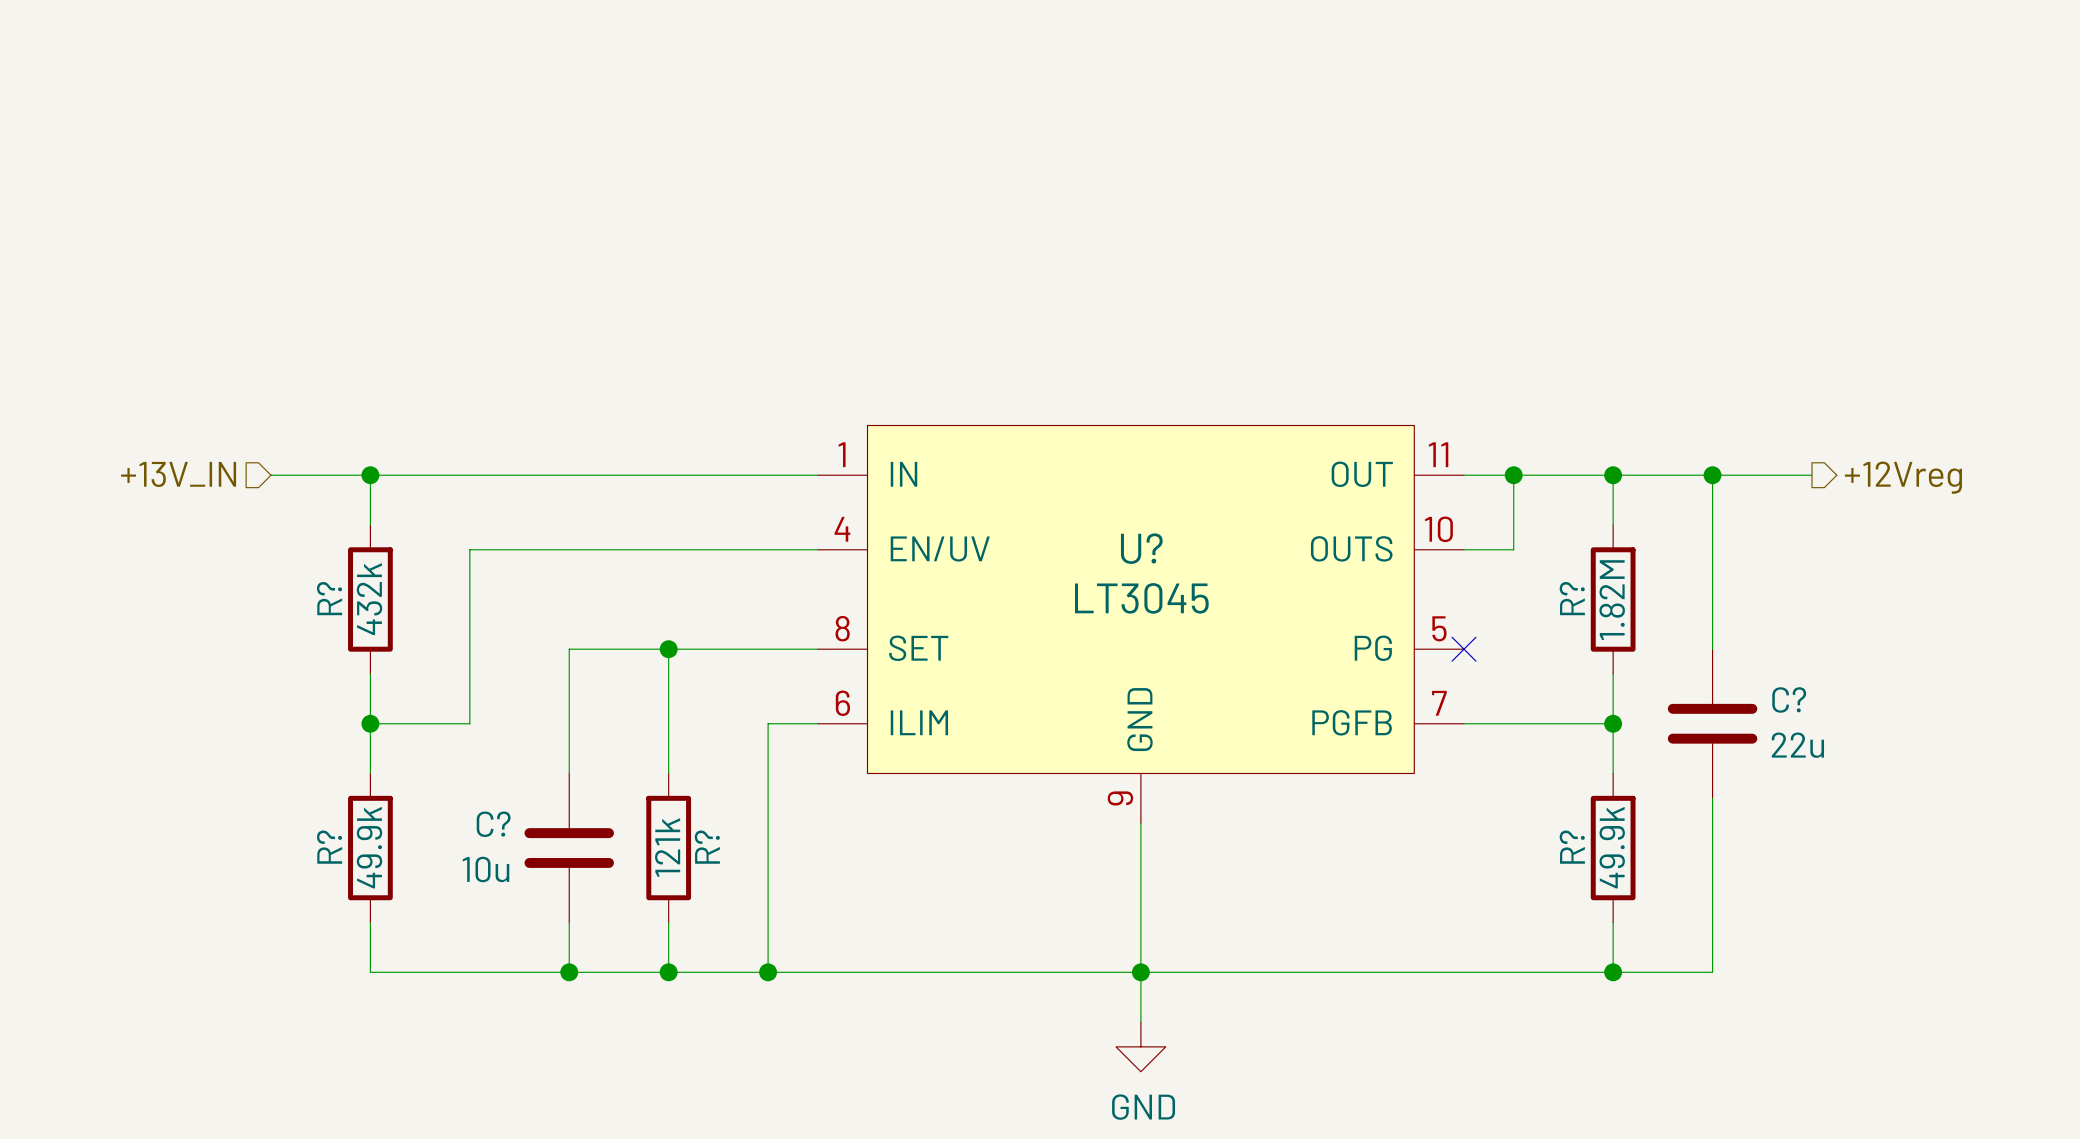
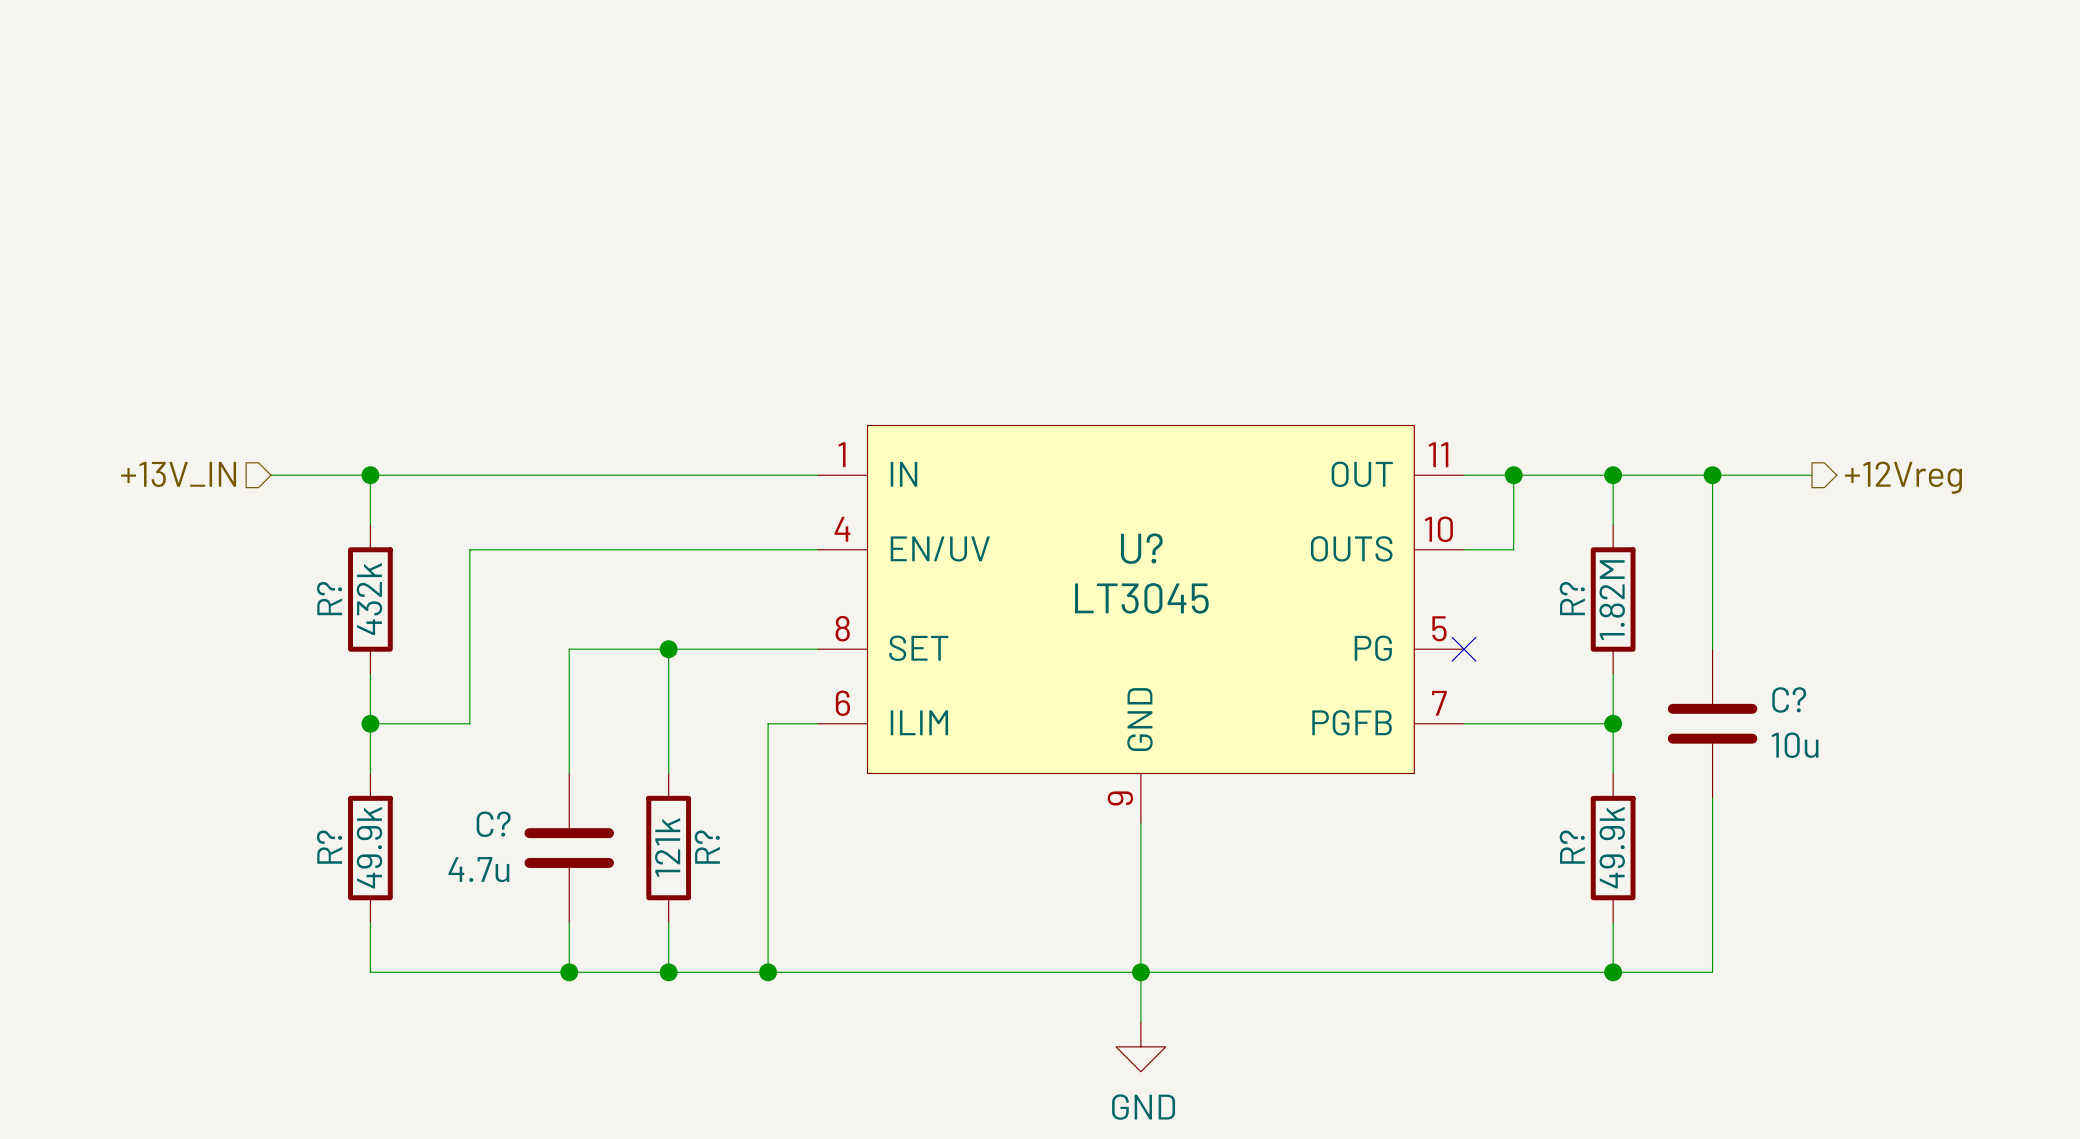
C? value: 22u (1797, 745) -> 10u (1795, 745)
C? value: 10u (485, 869) -> 4.7u (478, 869)

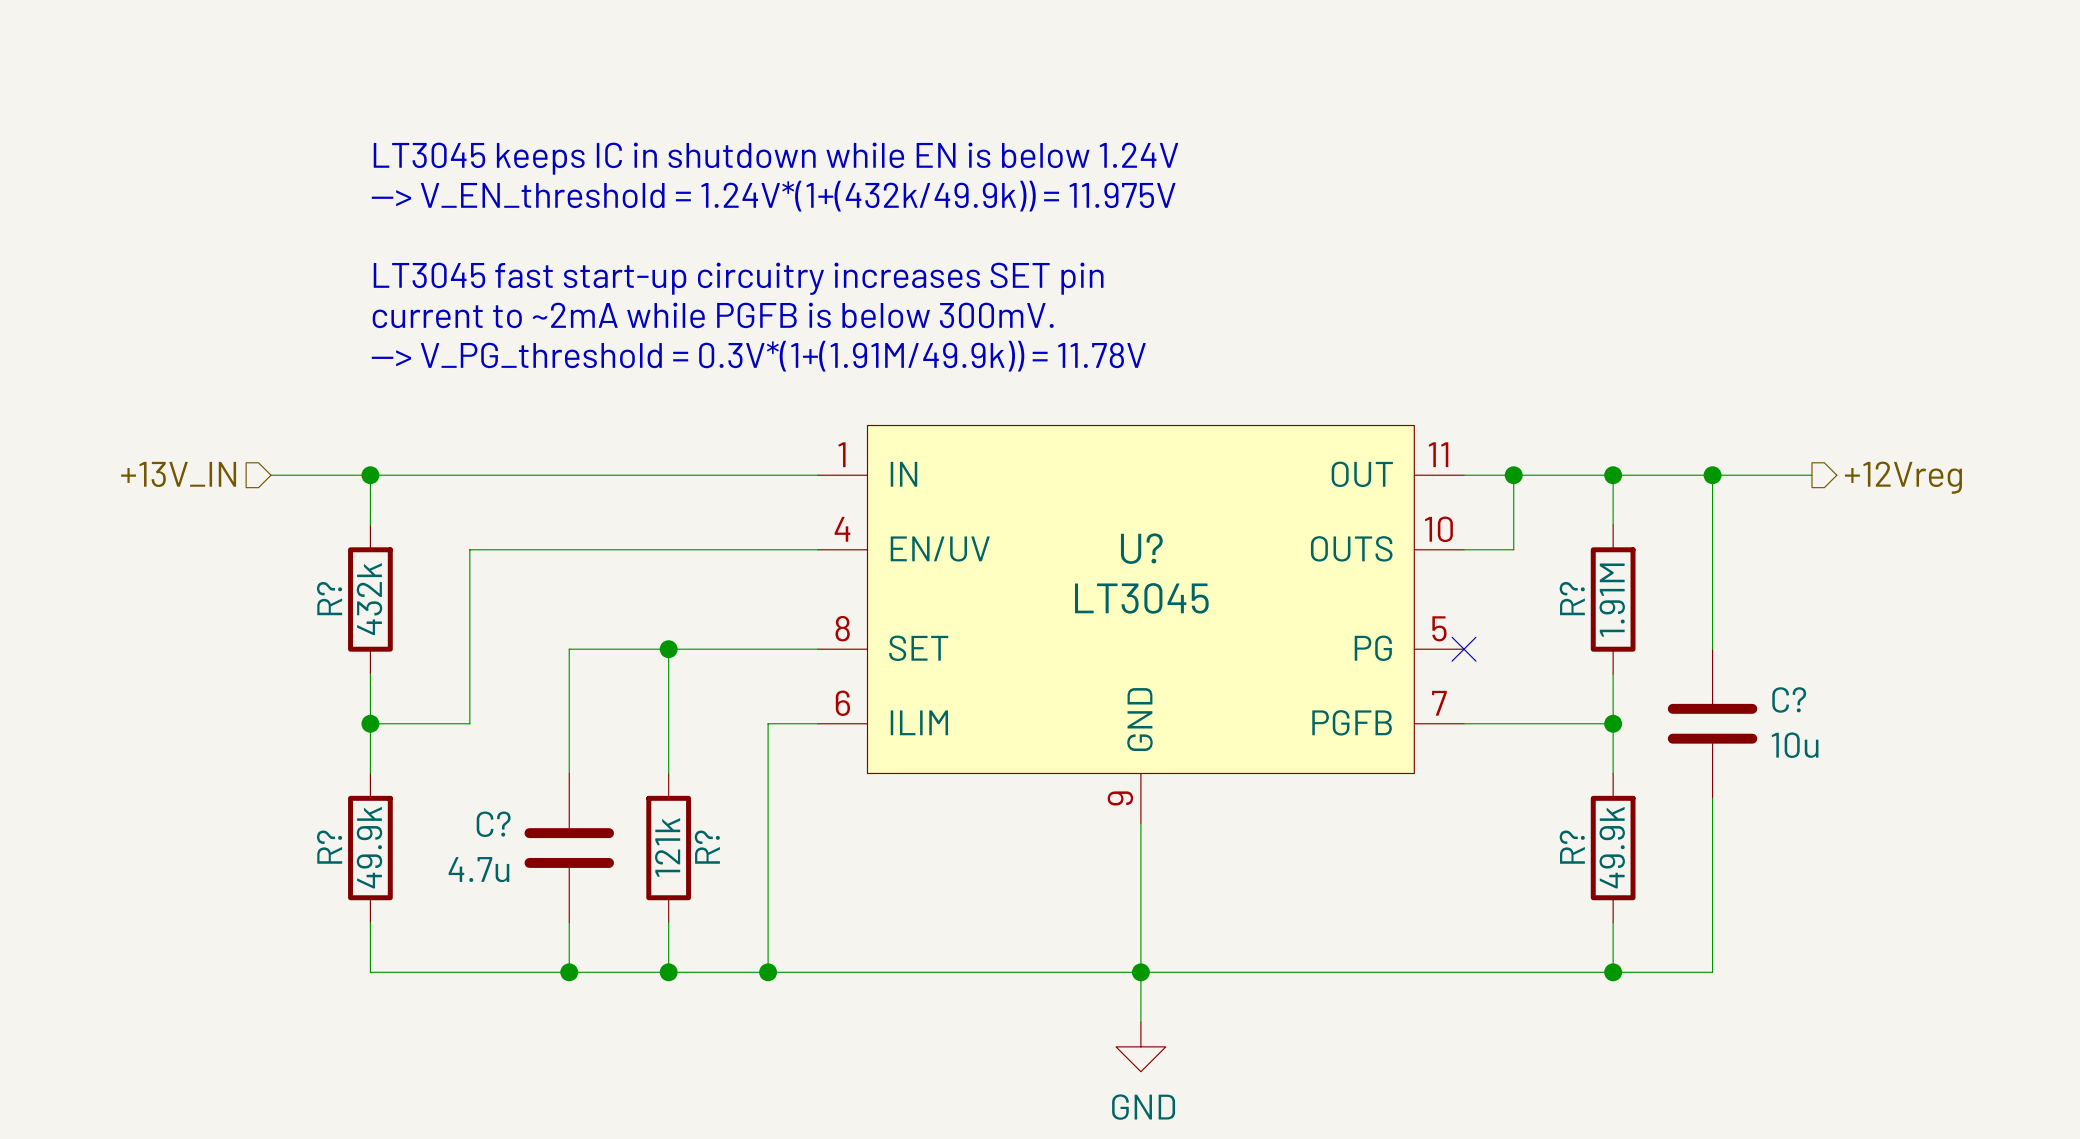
text: none -> LT3045 keeps IC in shutdown while EN is below 1.24V (776, 158)
text: none -> —> V_EN_threshold = 1.24V*(1+(432k/49.9k)) = 11.975V (773, 196)
text: none -> LT3045 fast start-up circuitry increases SET pin (738, 278)
text: none -> current to ~2mA while PGFB is below 300mV. (713, 315)
text: none -> —> V_PG_threshold = 0.3V*(1+(1.91M/49.9k)) = 11.78V (758, 356)
R? value: 1.82M (1612, 600) -> 1.91M (1612, 600)

